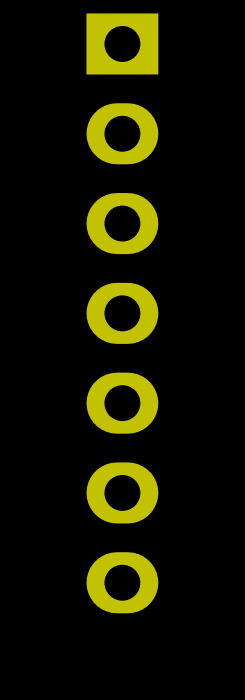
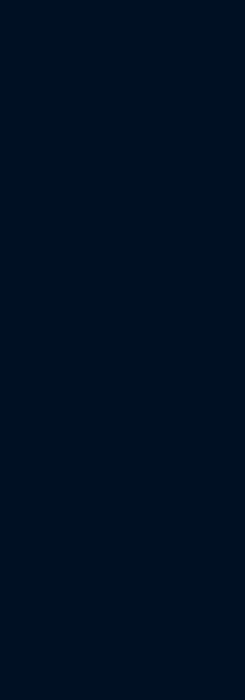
part: (122, 313) -> none

